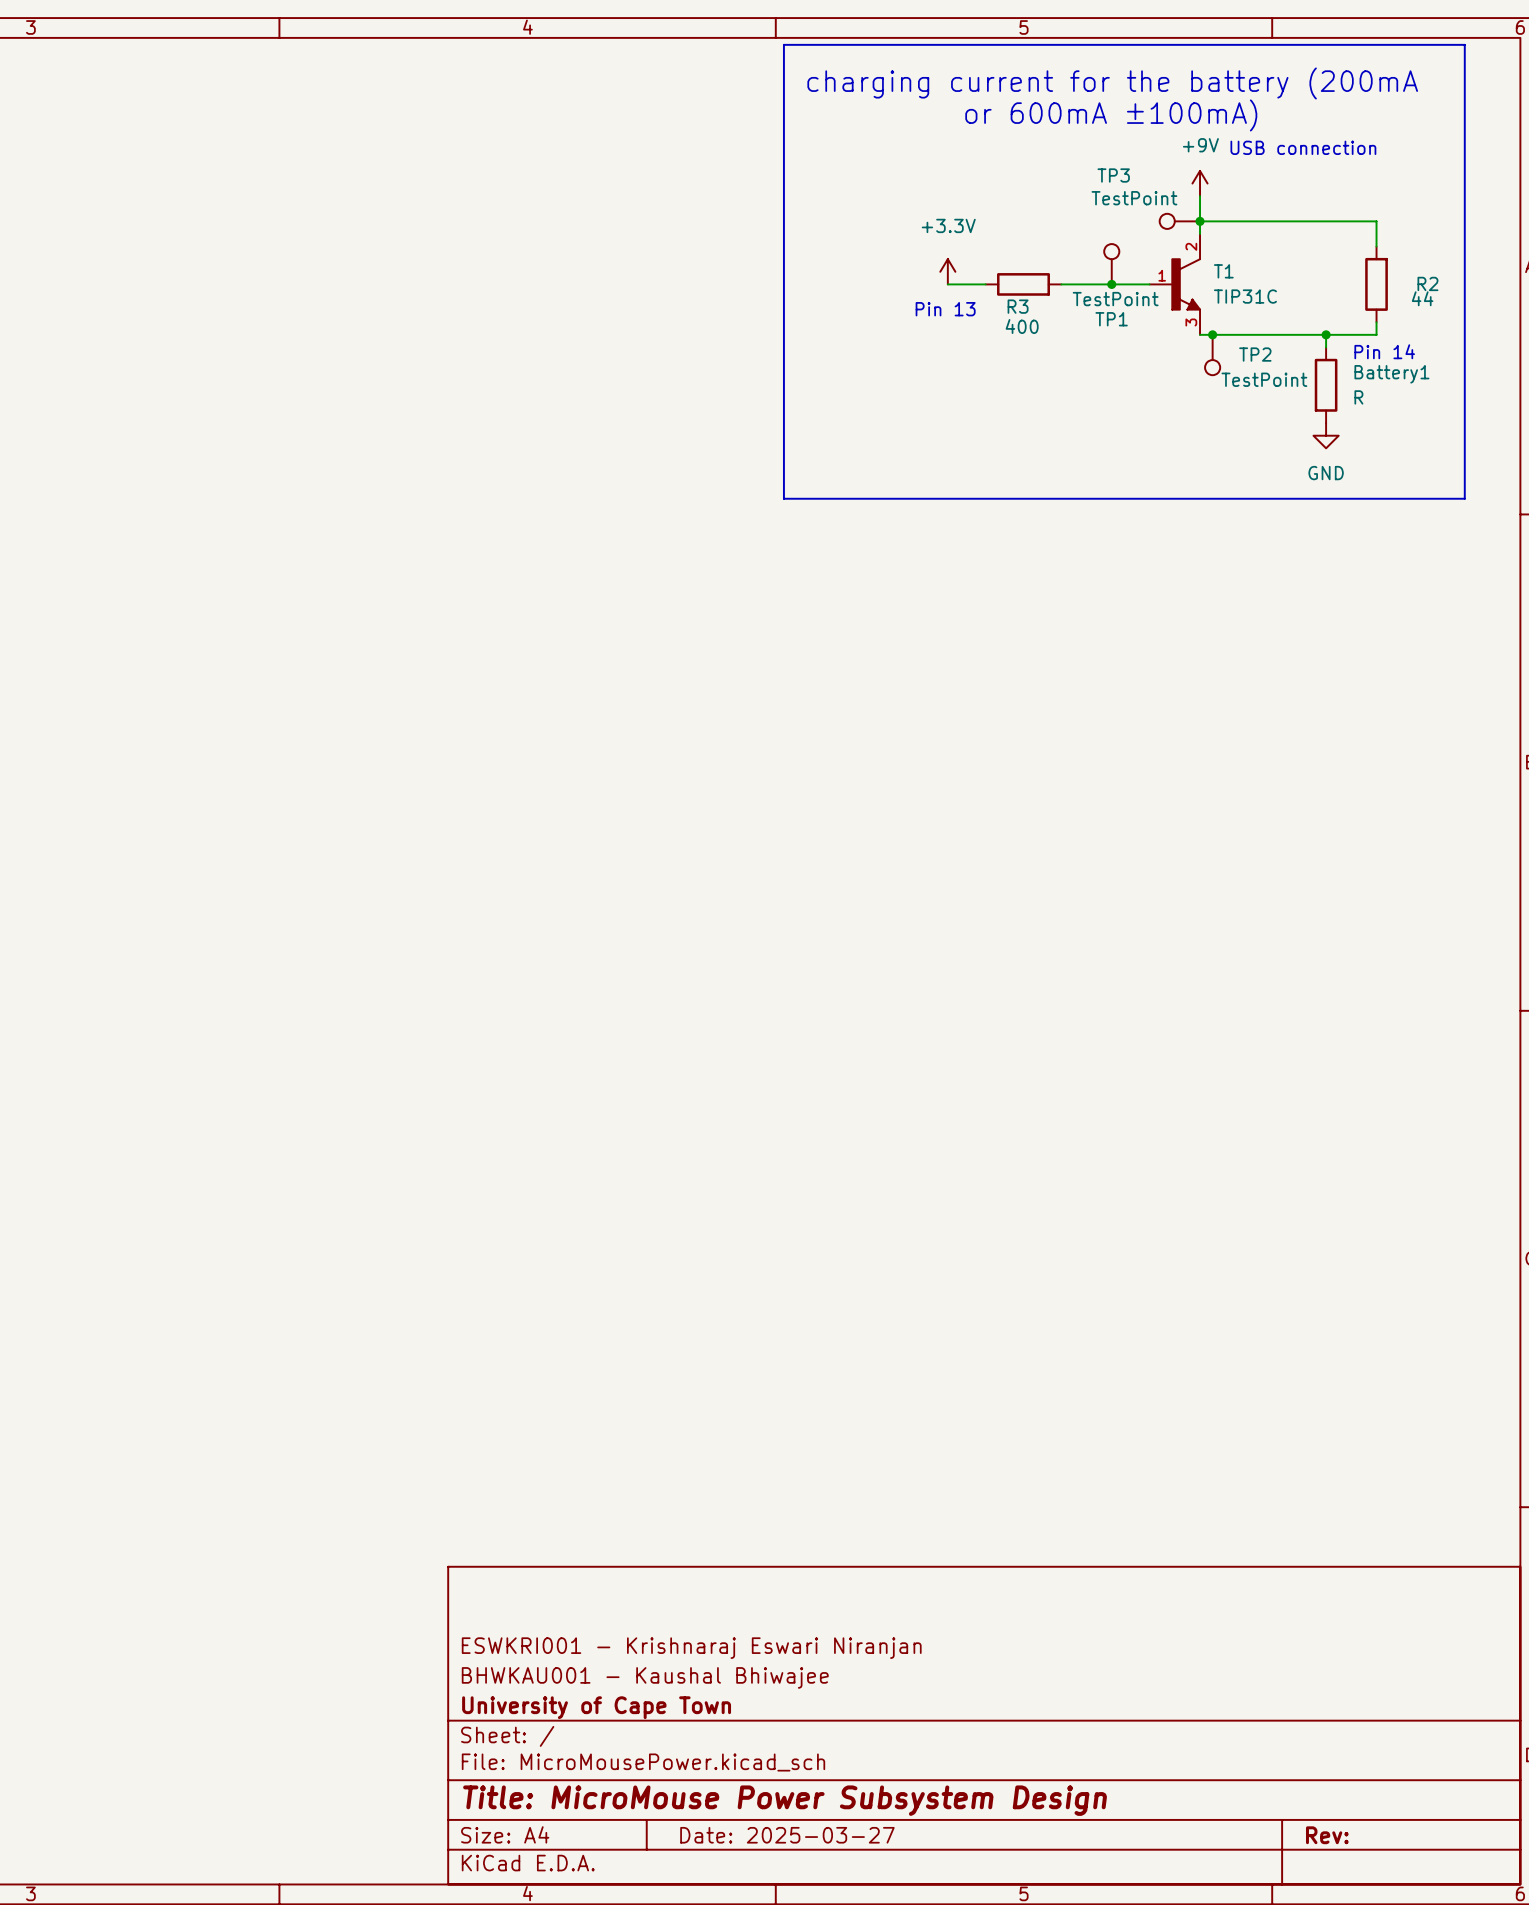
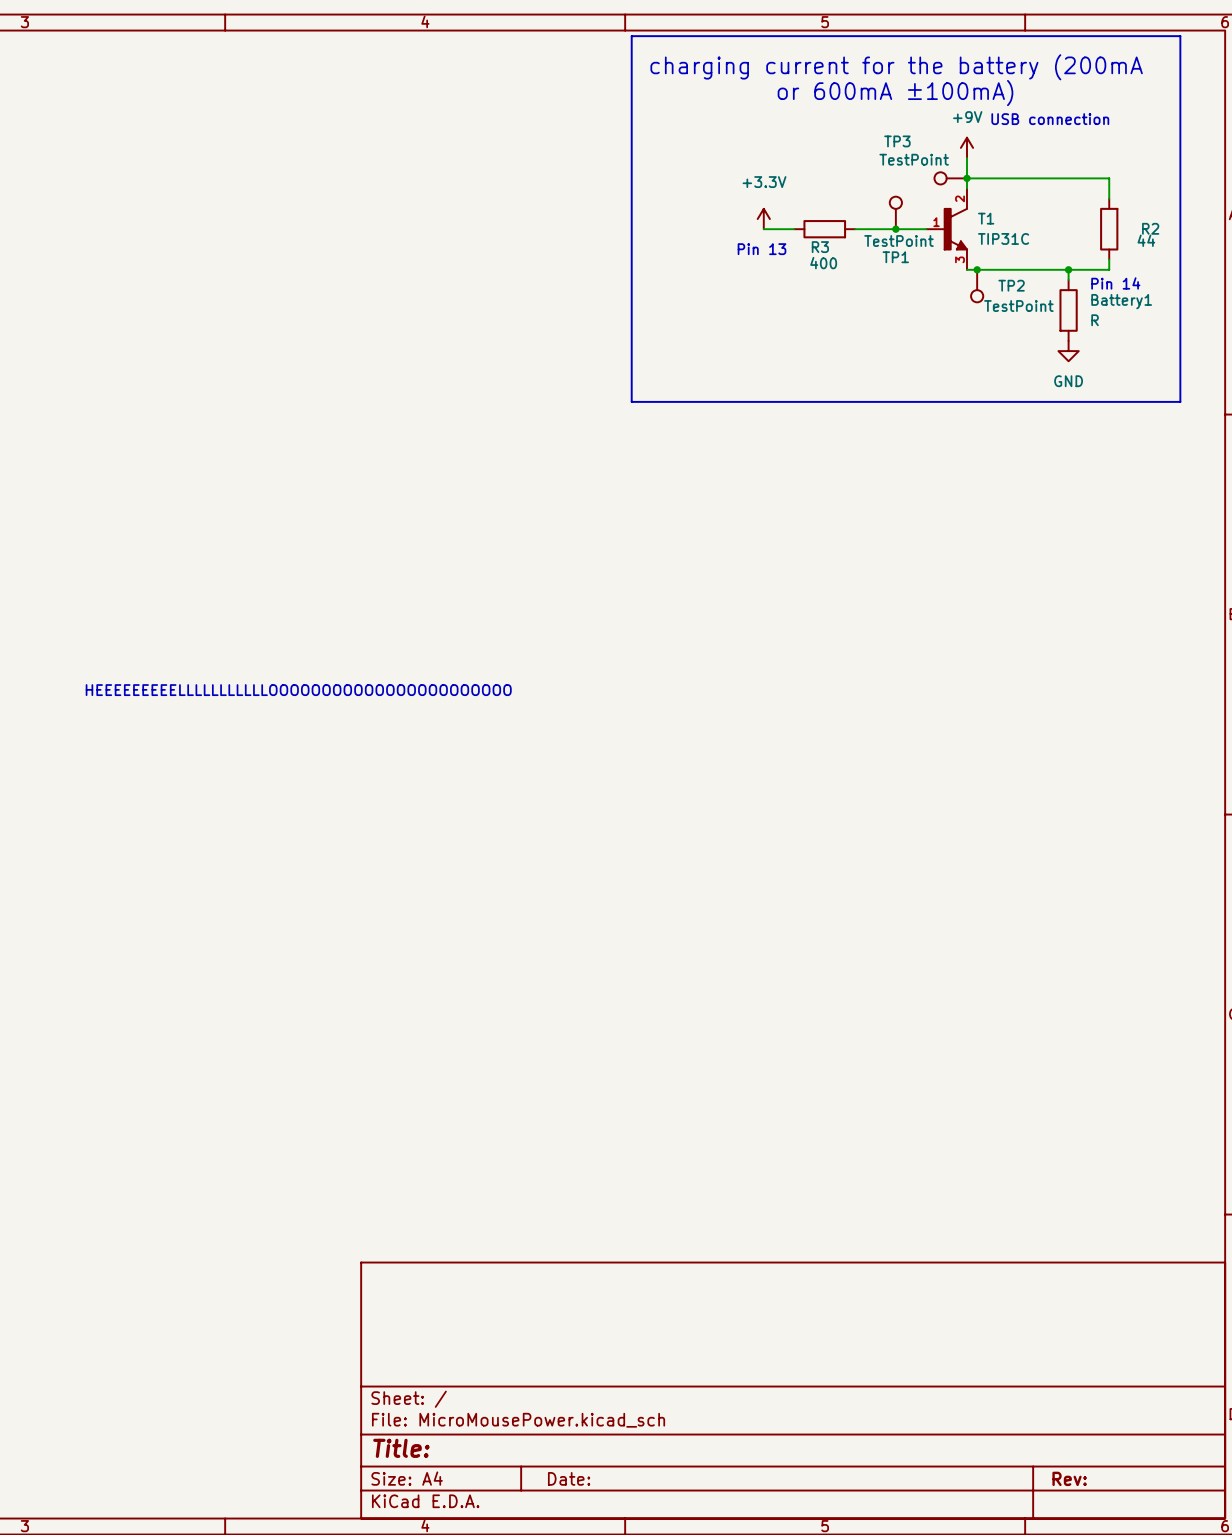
text: none -> HEEEEEEEEELLLLLLLLLLLOOOOOOOOOOOOOOOOOOOOOOO (298, 690)
title block: ESWKRI001 - Krishnaraj Eswari Niranjan (691, 1648) -> none
title block: BHWKAU001 - Kaushal Bhiwajee (645, 1677) -> none
title block: University of Cape Town (596, 1707) -> none
title block: Title: MicroMouse Power Subsystem Design (785, 1800) -> Title: (401, 1448)
title block: Date: 2025-03-27 (787, 1835) -> Date: (569, 1478)

